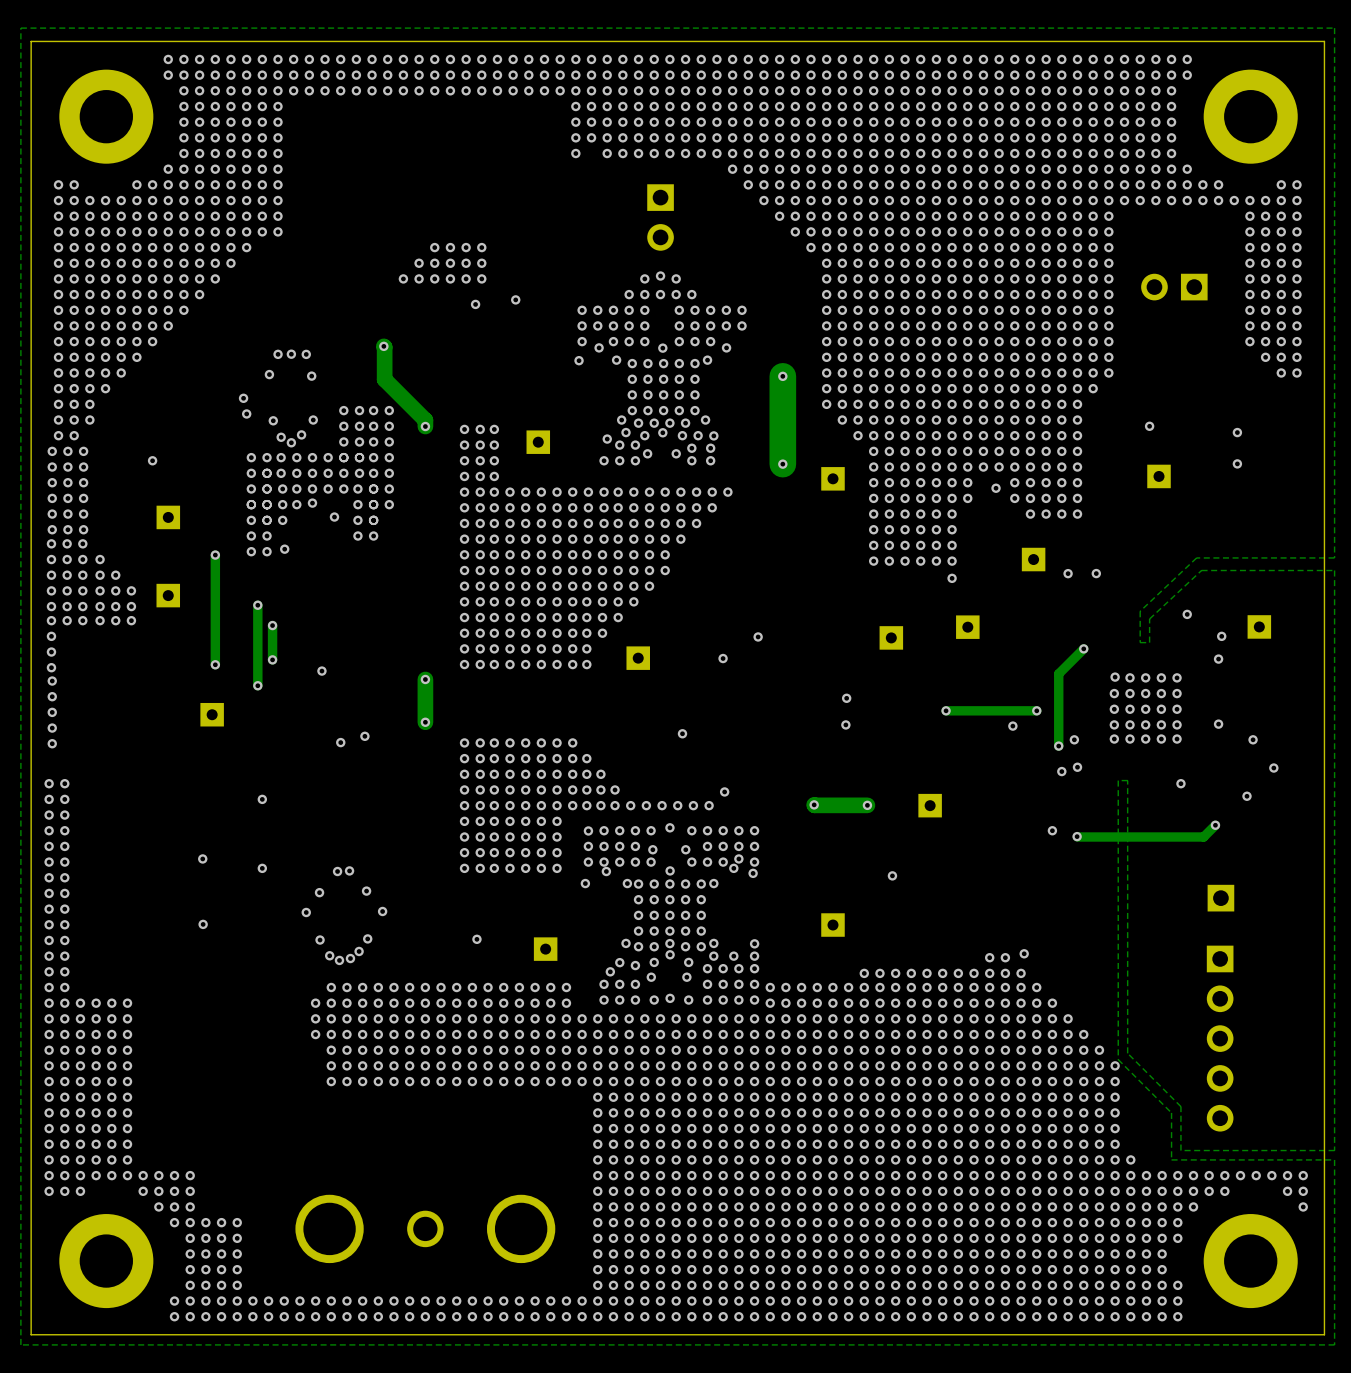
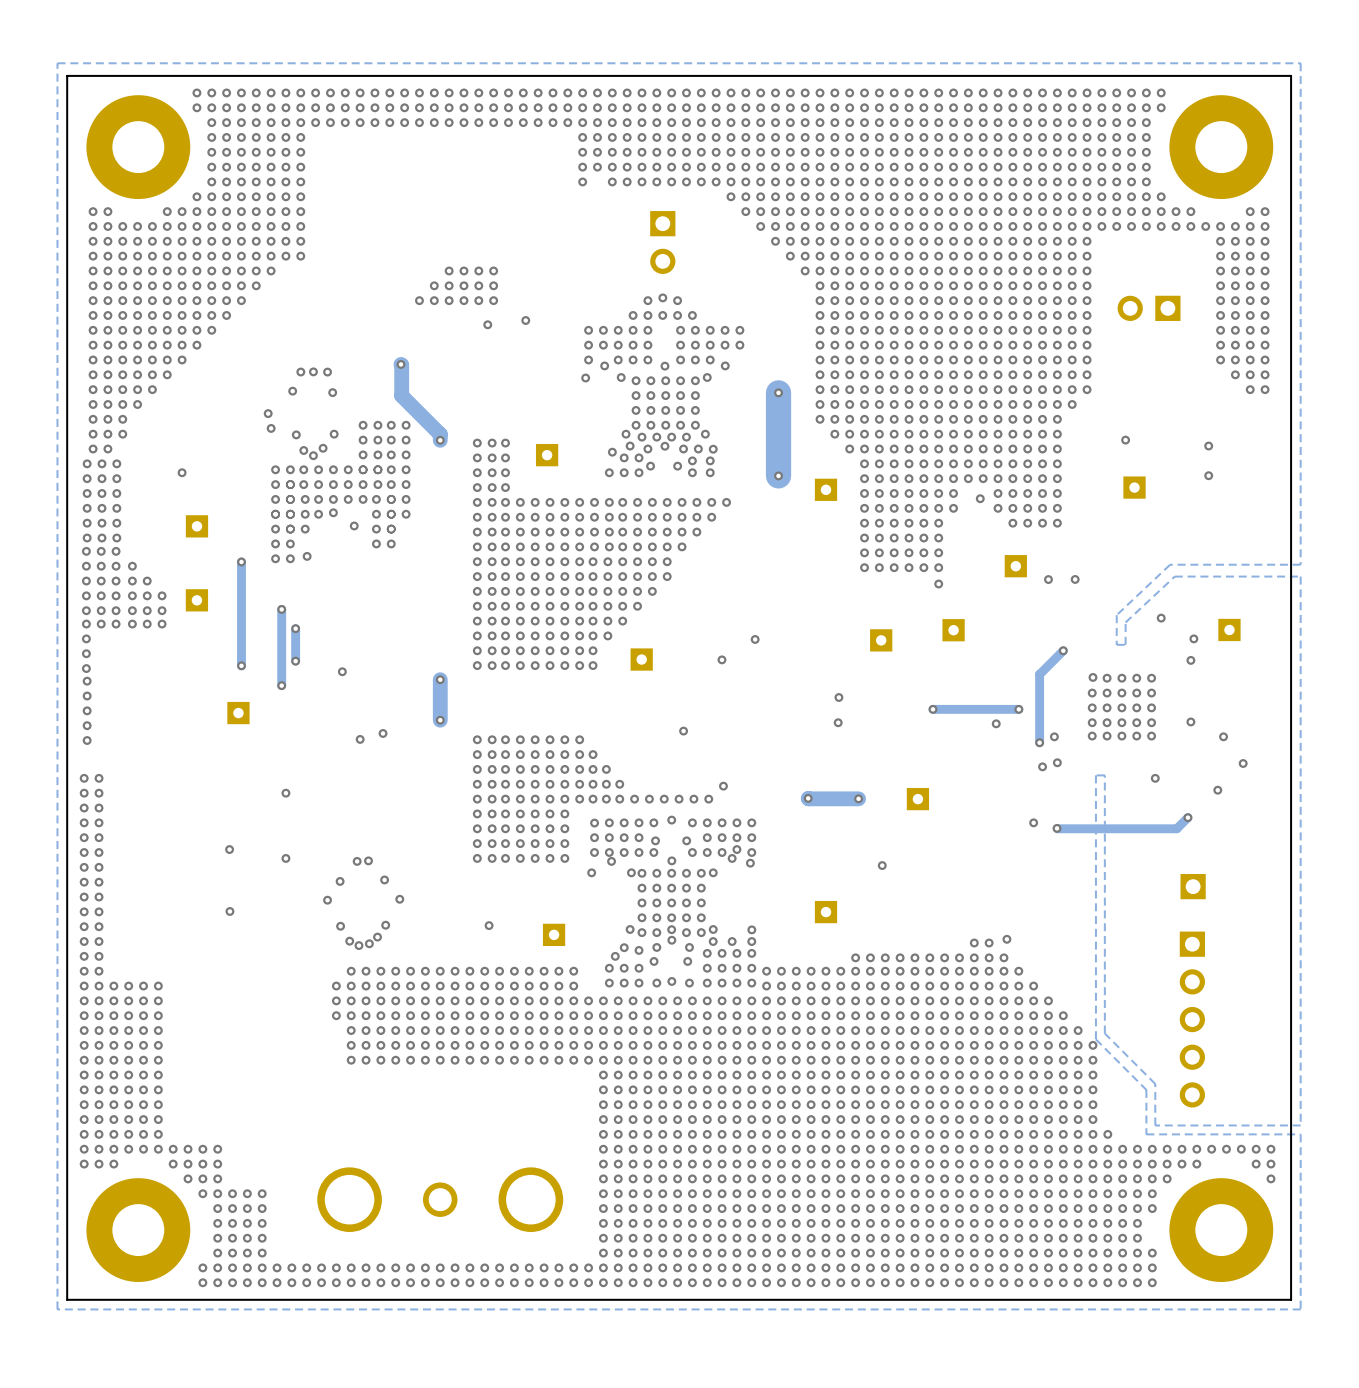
part footprint: [59, 69, 154, 164] -> [86, 95, 191, 200]
part footprint: [1203, 69, 1298, 164] -> [1169, 95, 1274, 200]
part footprint: [59, 1214, 154, 1309] -> [86, 1178, 191, 1282]
part footprint: [1203, 1214, 1298, 1309] -> [1169, 1178, 1274, 1282]

